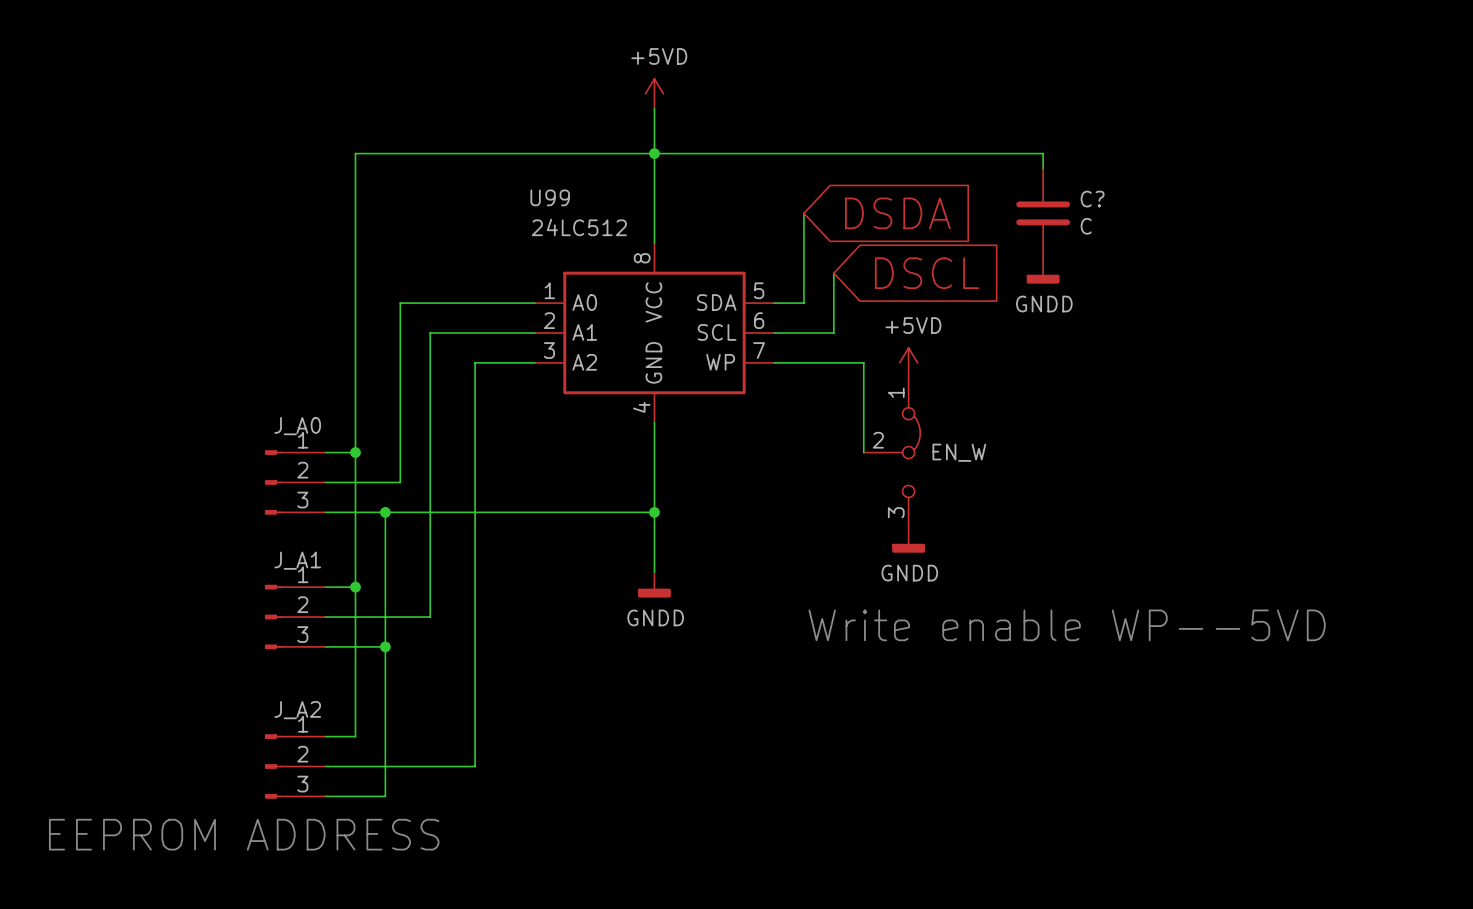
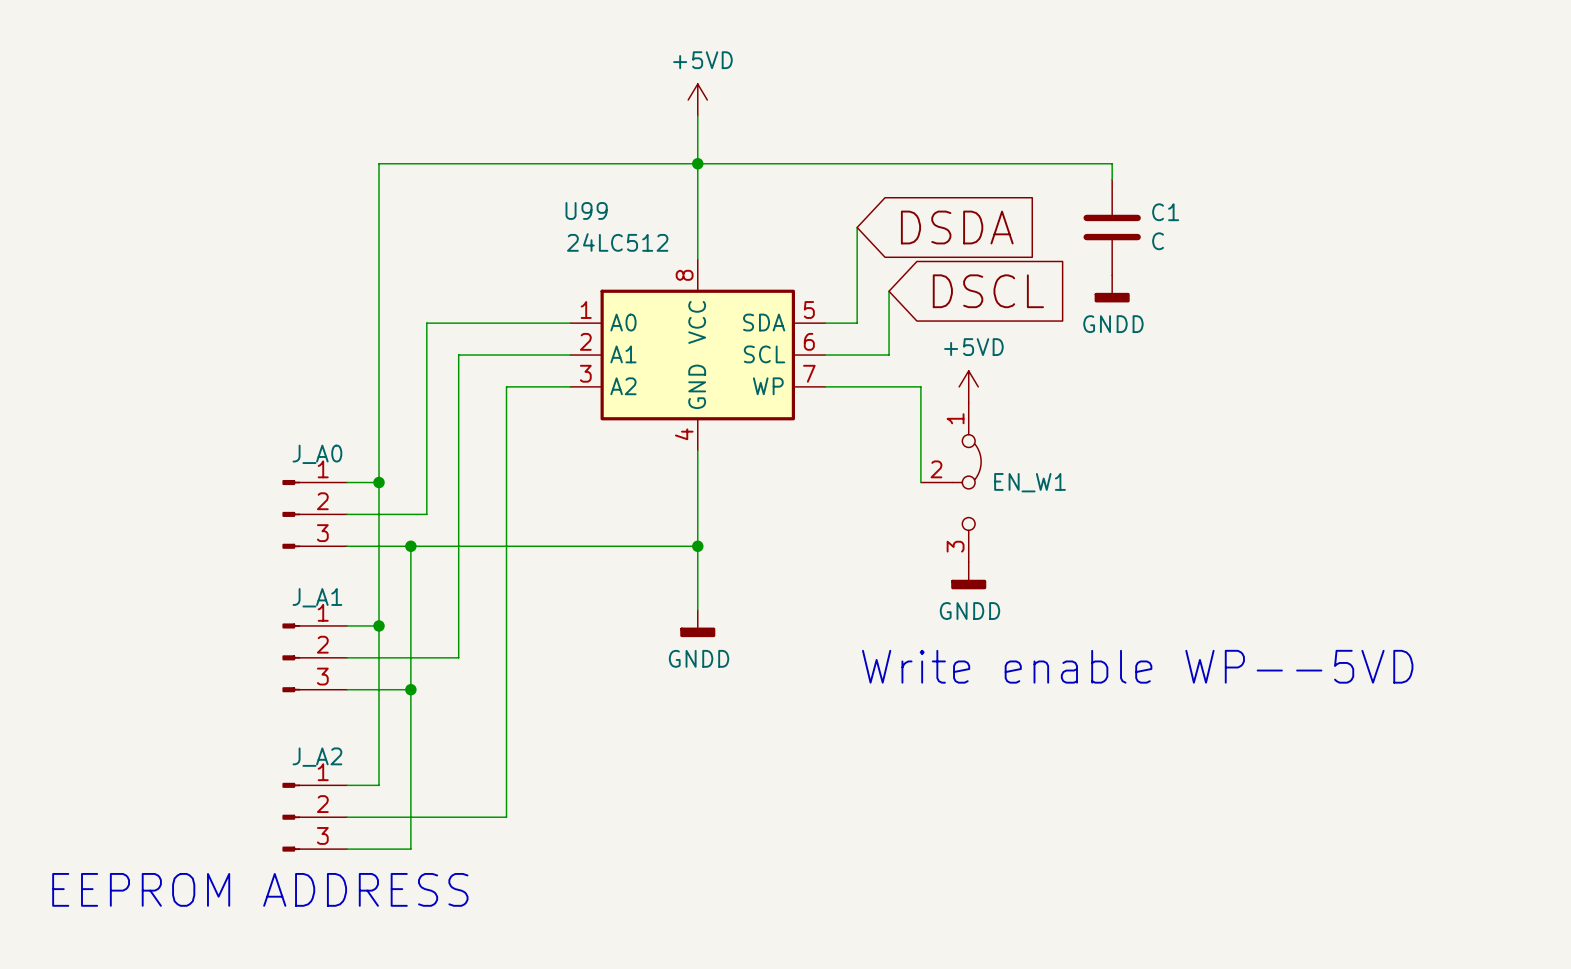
C? name: C? (1092, 199) -> C1 (1165, 212)
EN_W name: EN_W (959, 452) -> EN_W1 (1030, 482)

